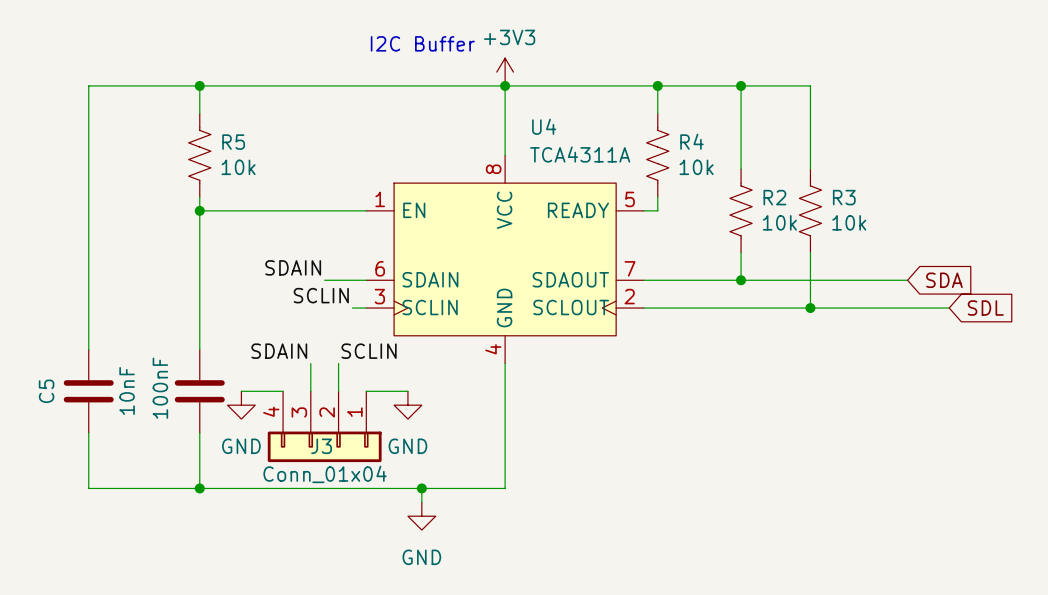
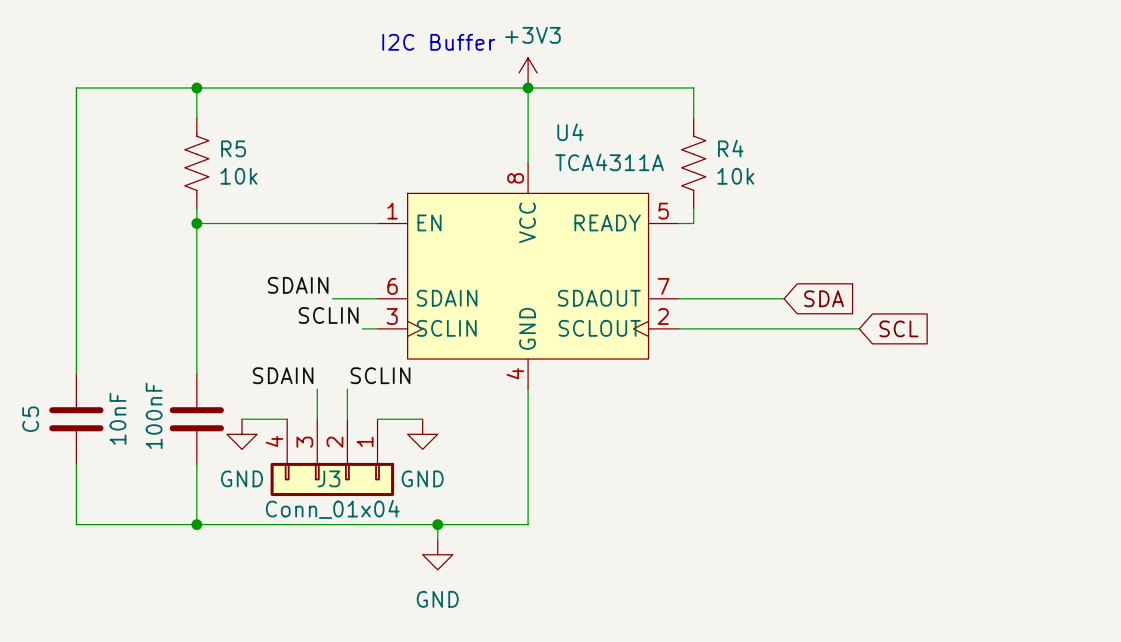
wire: (657, 85) (810, 85) (810, 169) -> none
junction: (657, 85) -> none
wire: (741, 85) (741, 169) -> none
junction: (741, 85) -> none
R2: 10k (741, 210) -> none
R3: 10k (810, 210) -> none
wire: (741, 252) (741, 280) (907, 280) -> none
wire: (810, 252) (810, 308) (949, 308) -> none
junction: (741, 280) -> none
global label position: SDA (944, 280) -> SDA (824, 298)
junction: (810, 308) -> none
global label: none -> SCL (898, 328)
global label: SDL (985, 308) -> none

